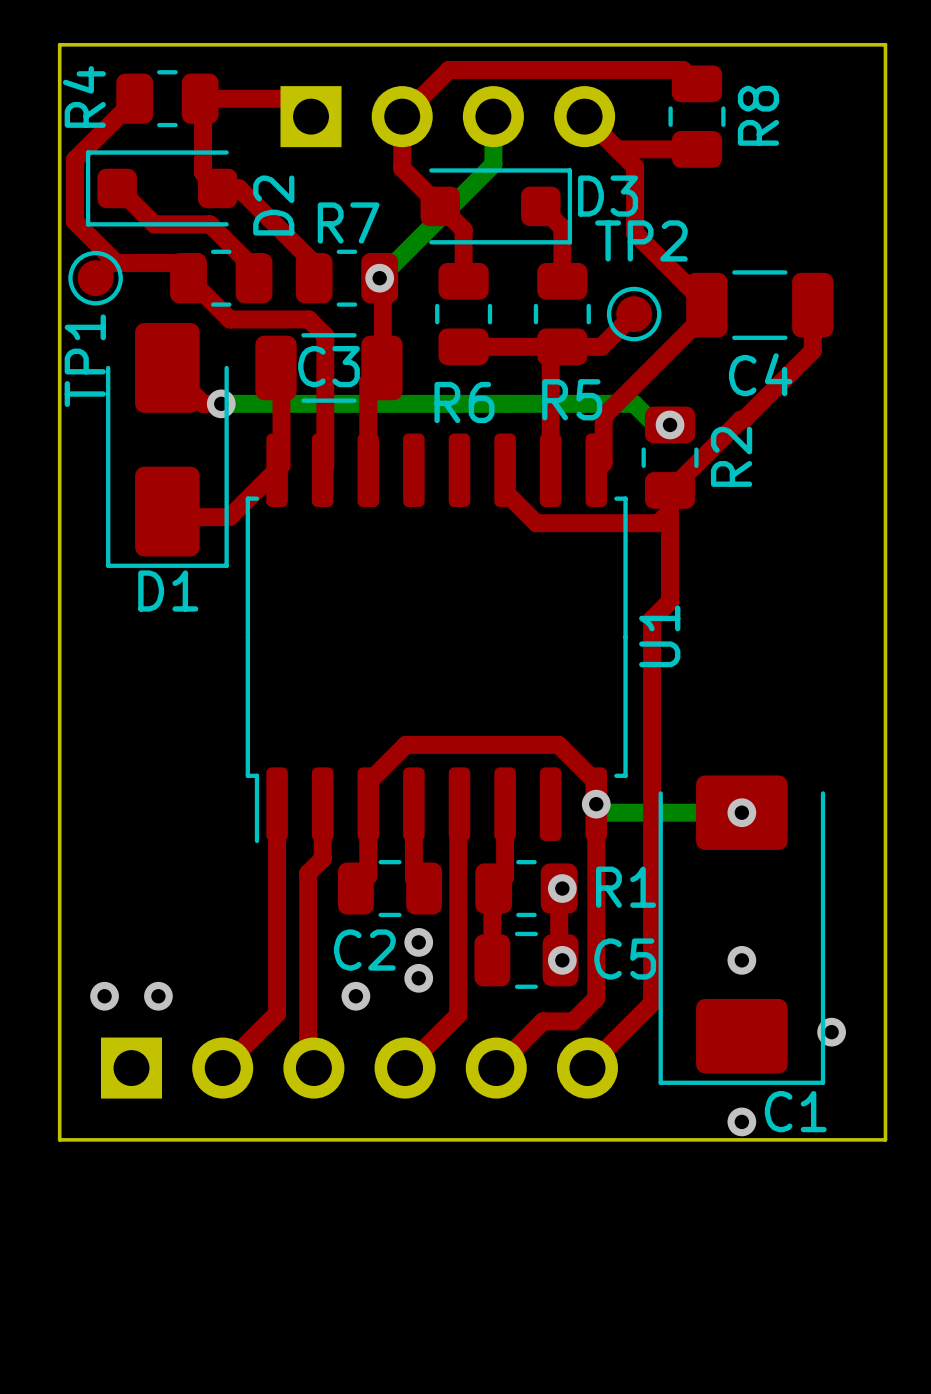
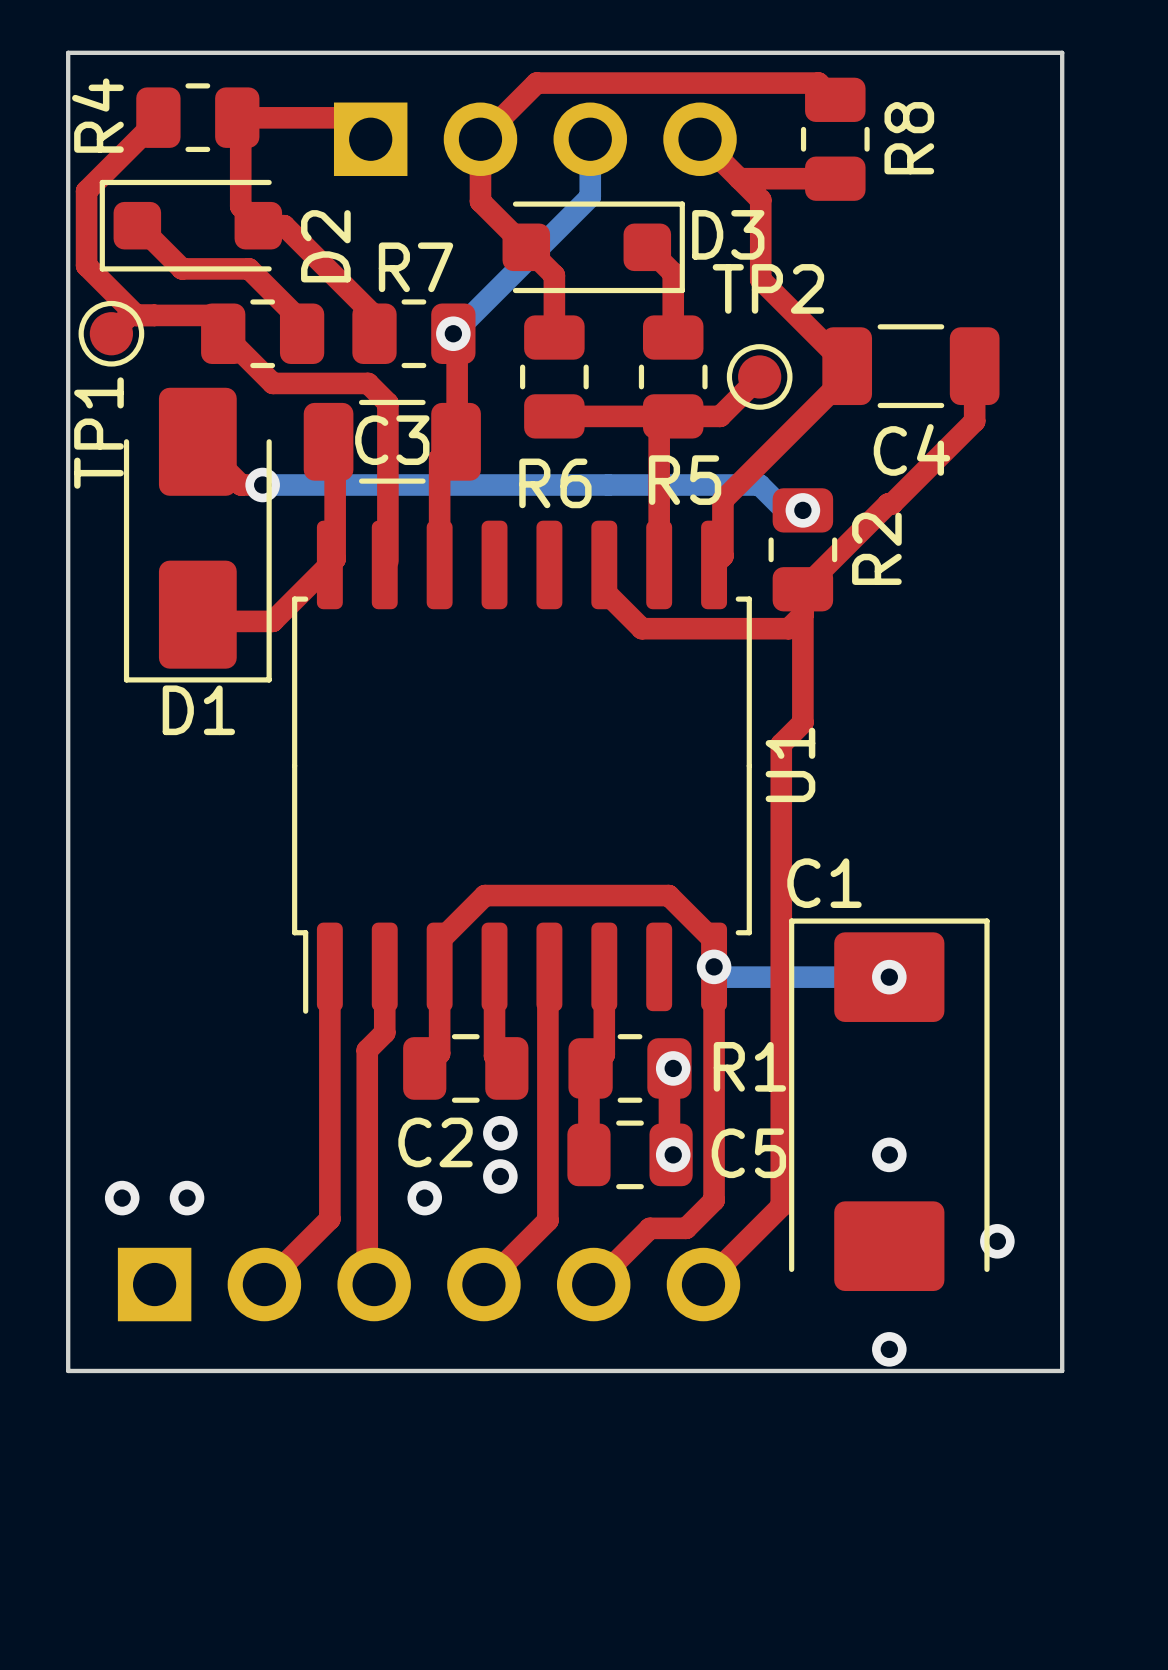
C1 rotation: 0° (741, 930) -> 180° (889, 1104)

